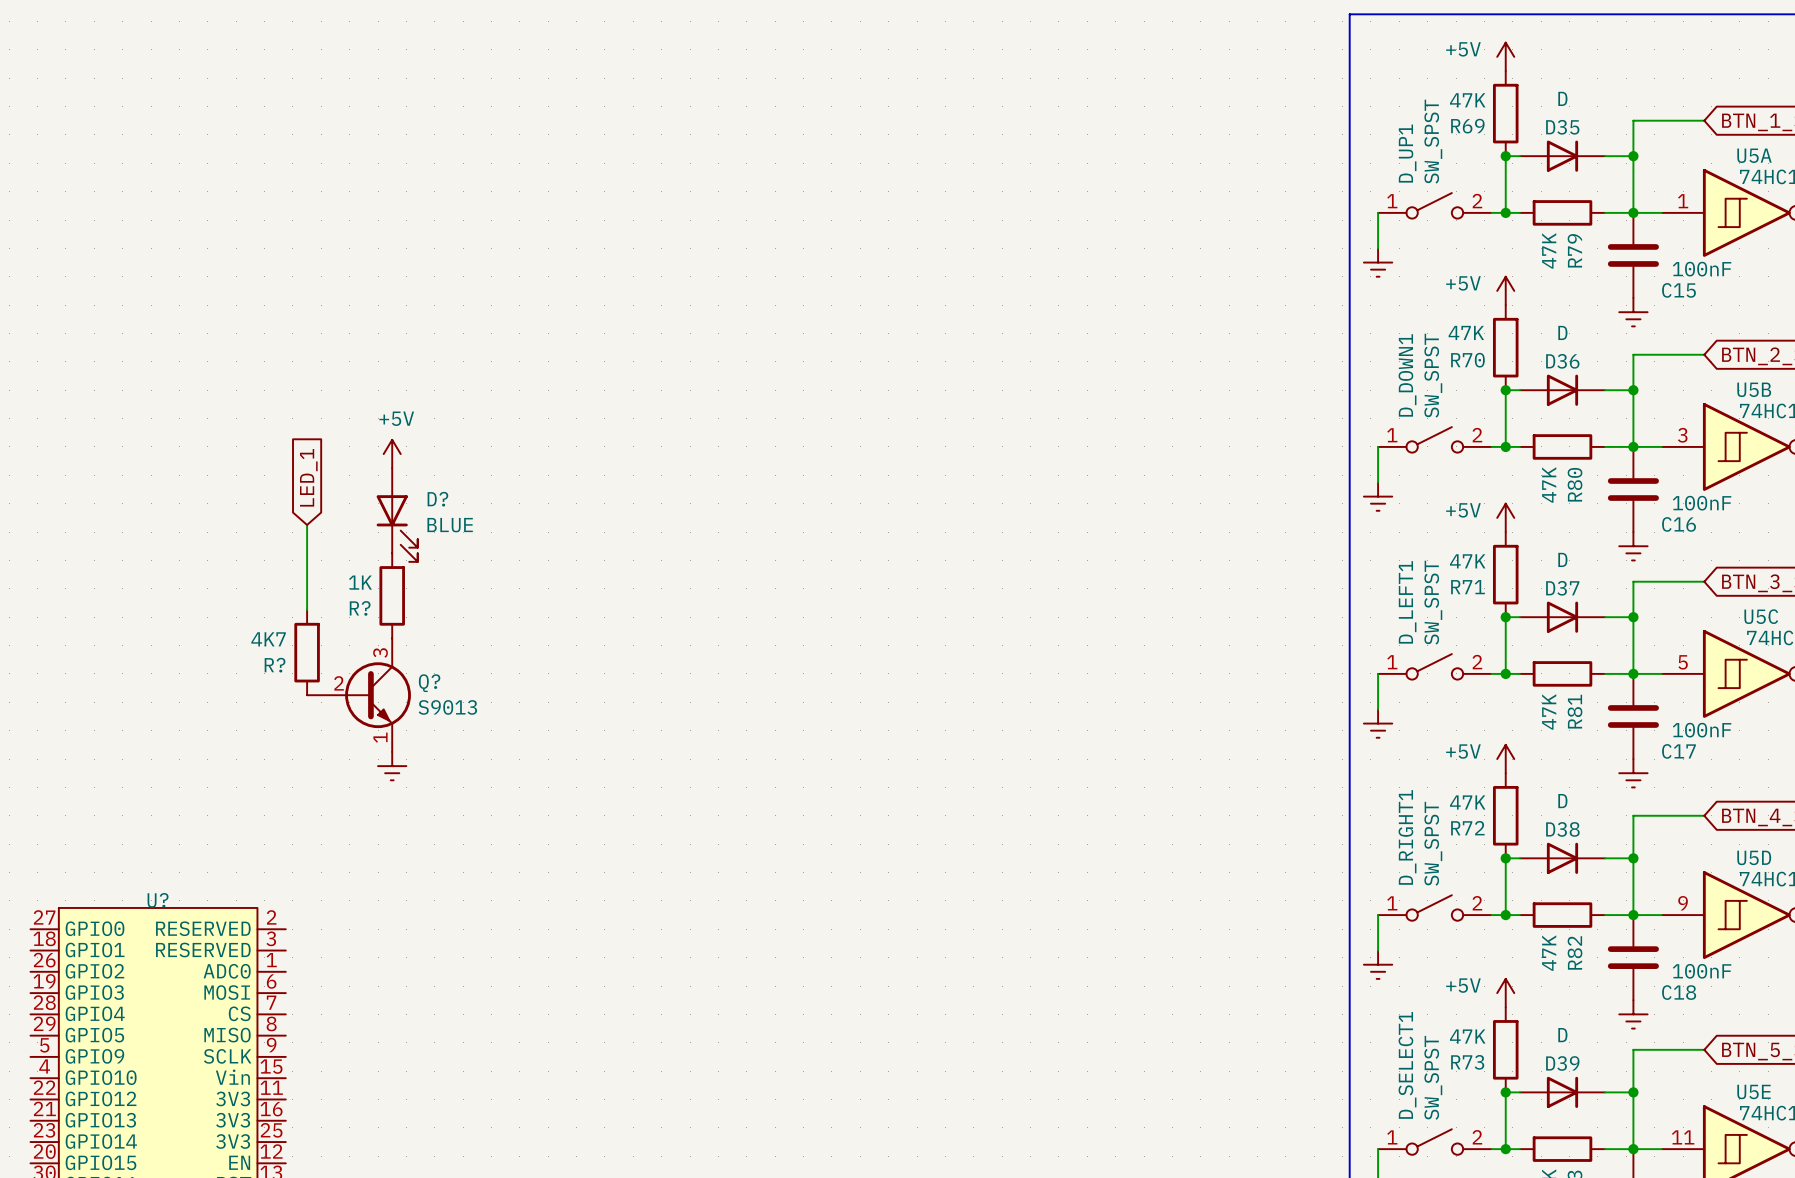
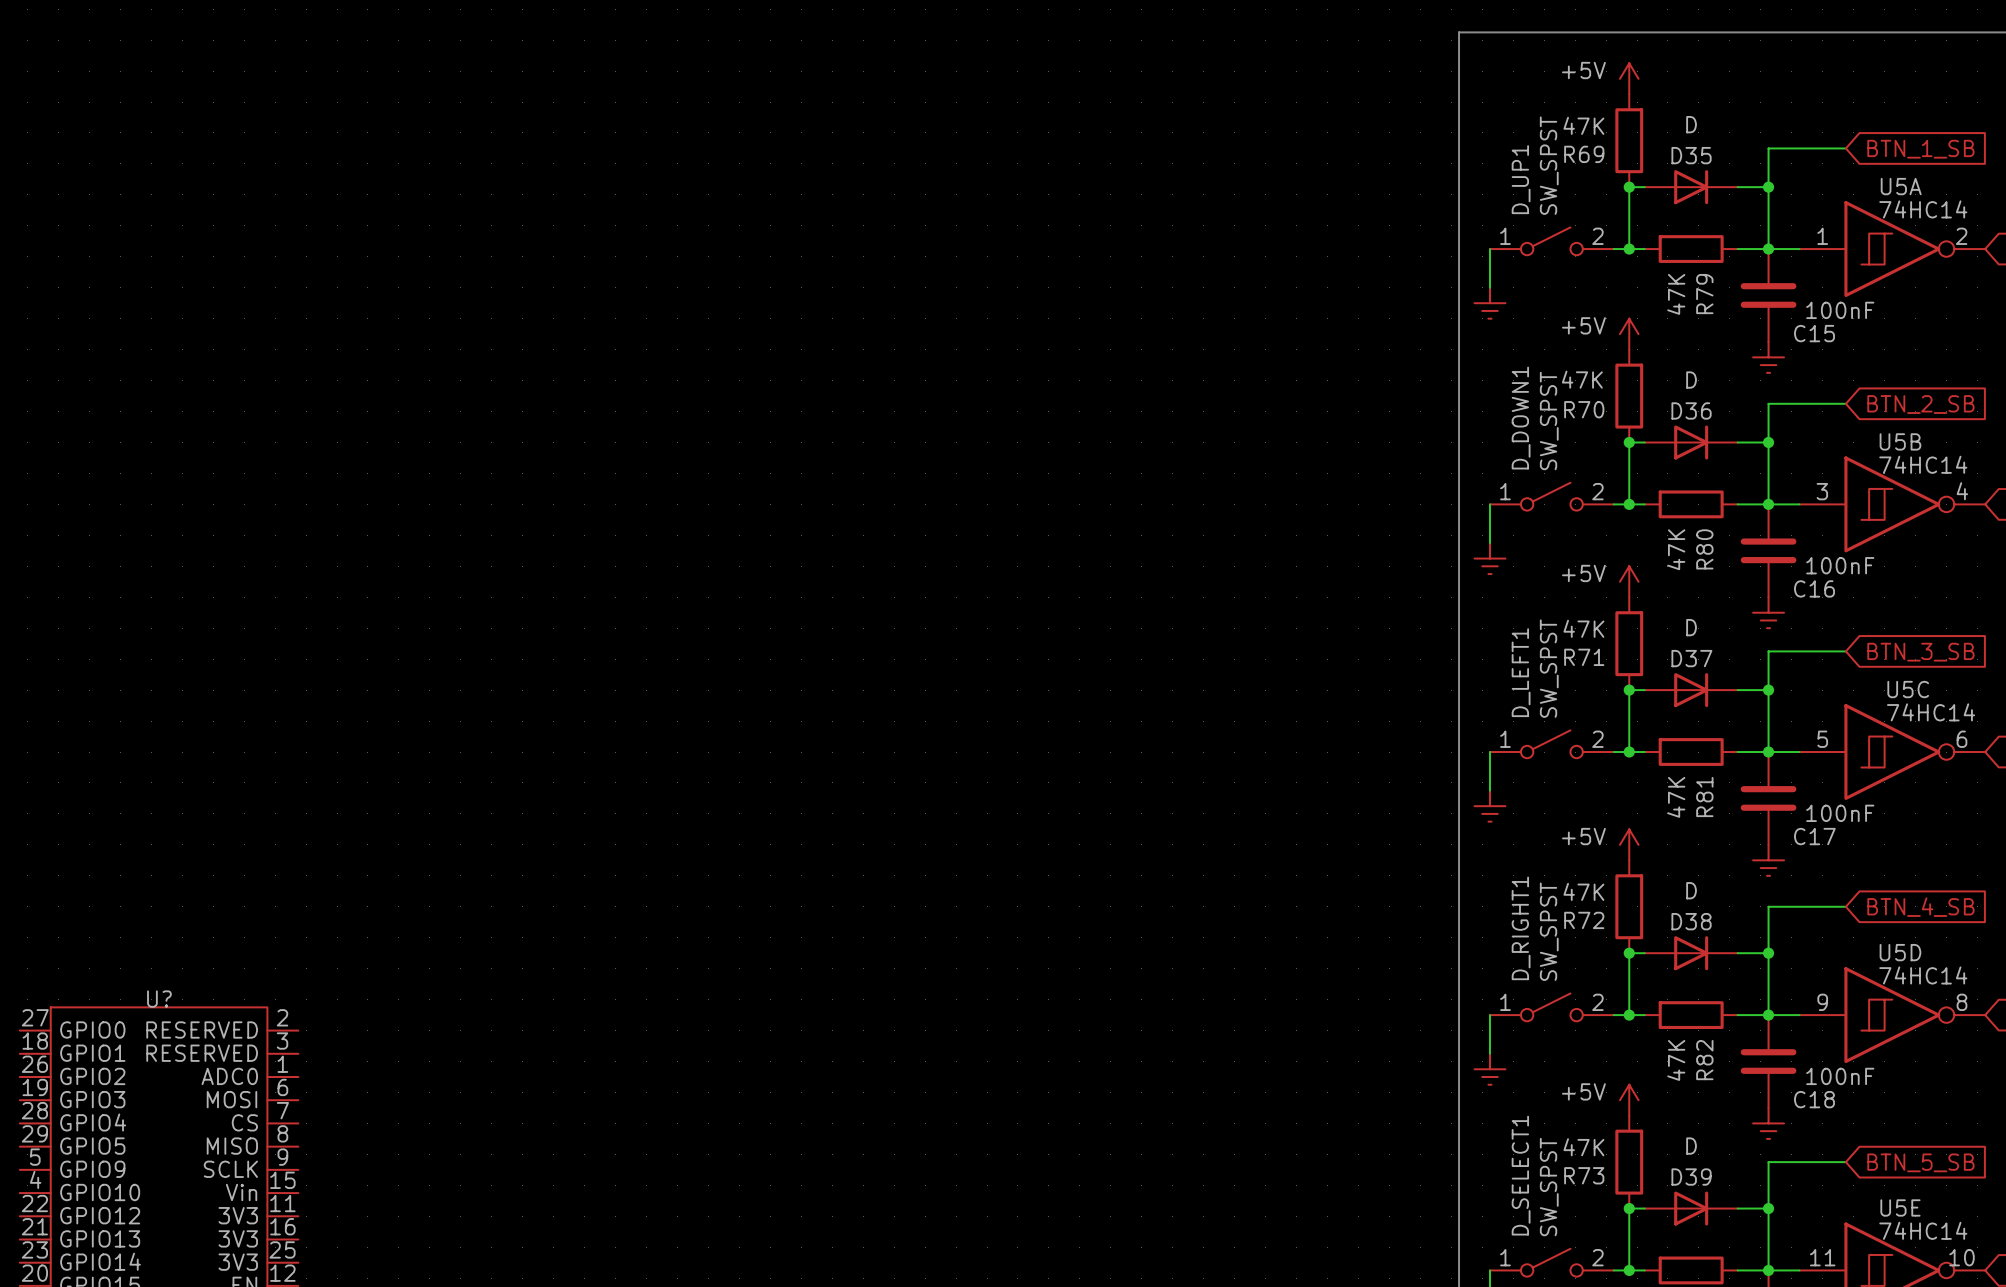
power symbol: +5V (392, 454) -> none
global label: LED_1 (308, 477) -> none
D?: BLUE (397, 515) -> none
wire: (307, 524) (307, 610) -> none
R?: 1K (392, 595) -> none
R?: 4K7 (307, 652) -> none
Q?: S9013 (359, 695) -> none
power symbol: (392, 766) -> none

